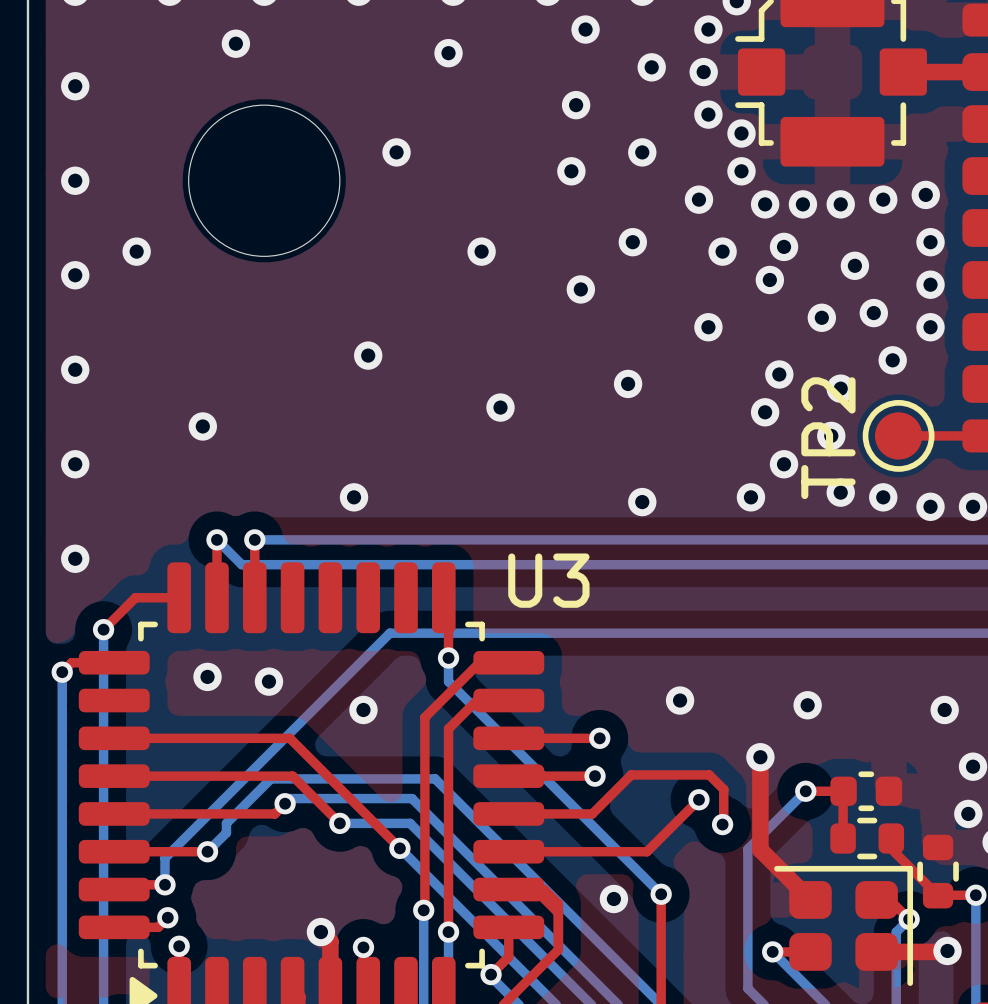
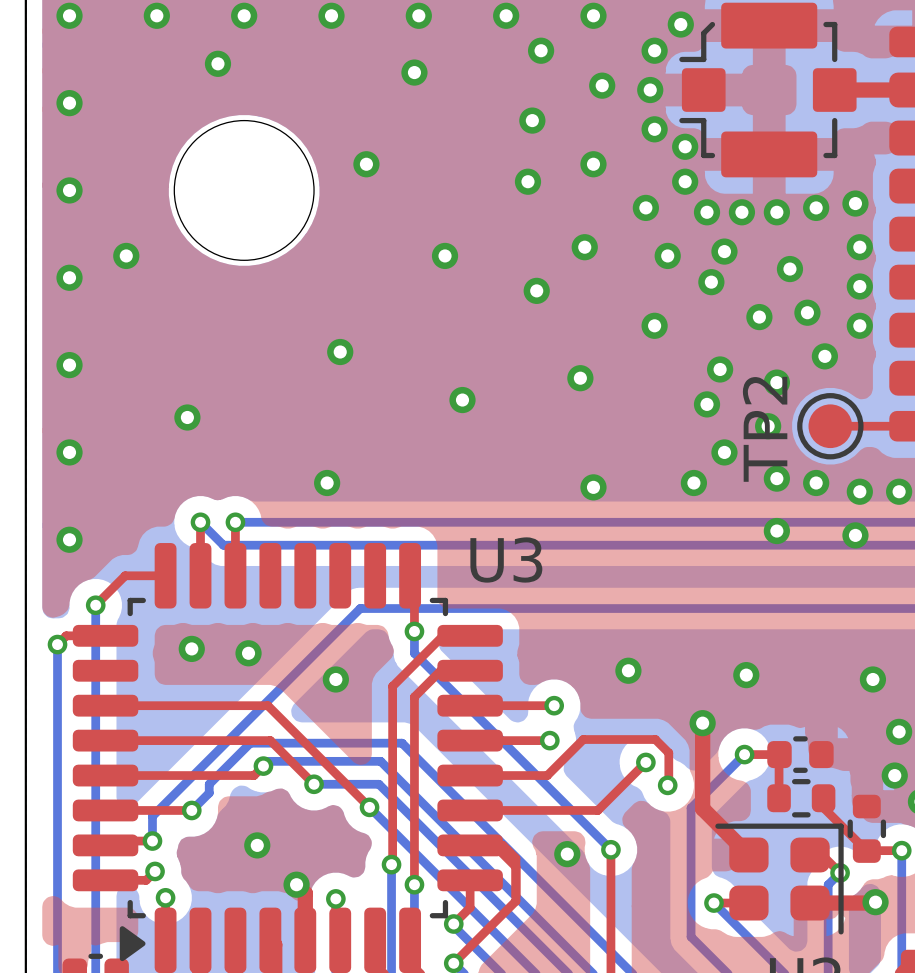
via: none -> (776, 531)
via: none -> (855, 535)
via: none -> (257, 845)

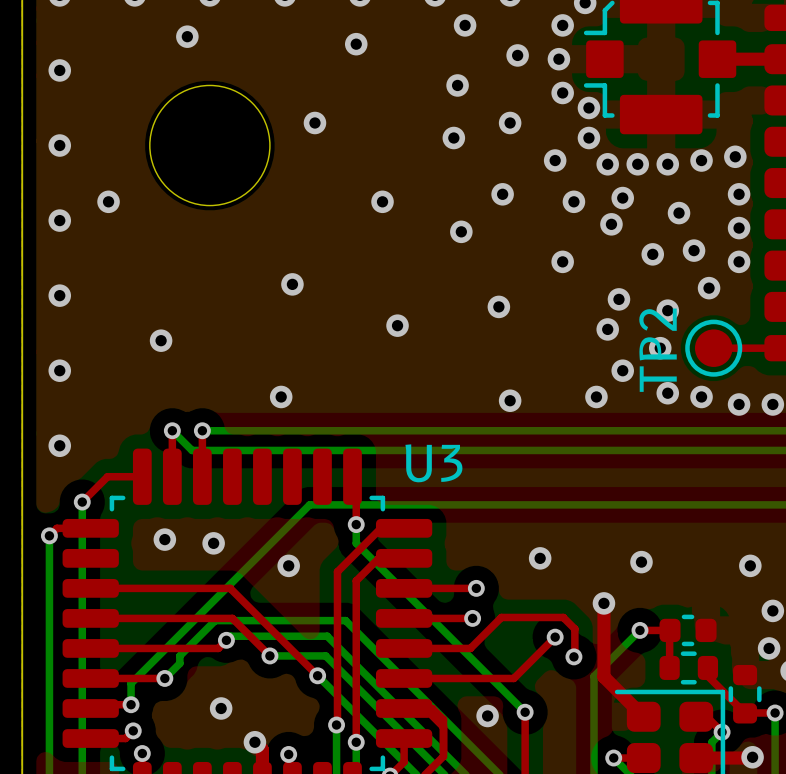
via: (776, 531) -> none
via: (855, 535) -> none

